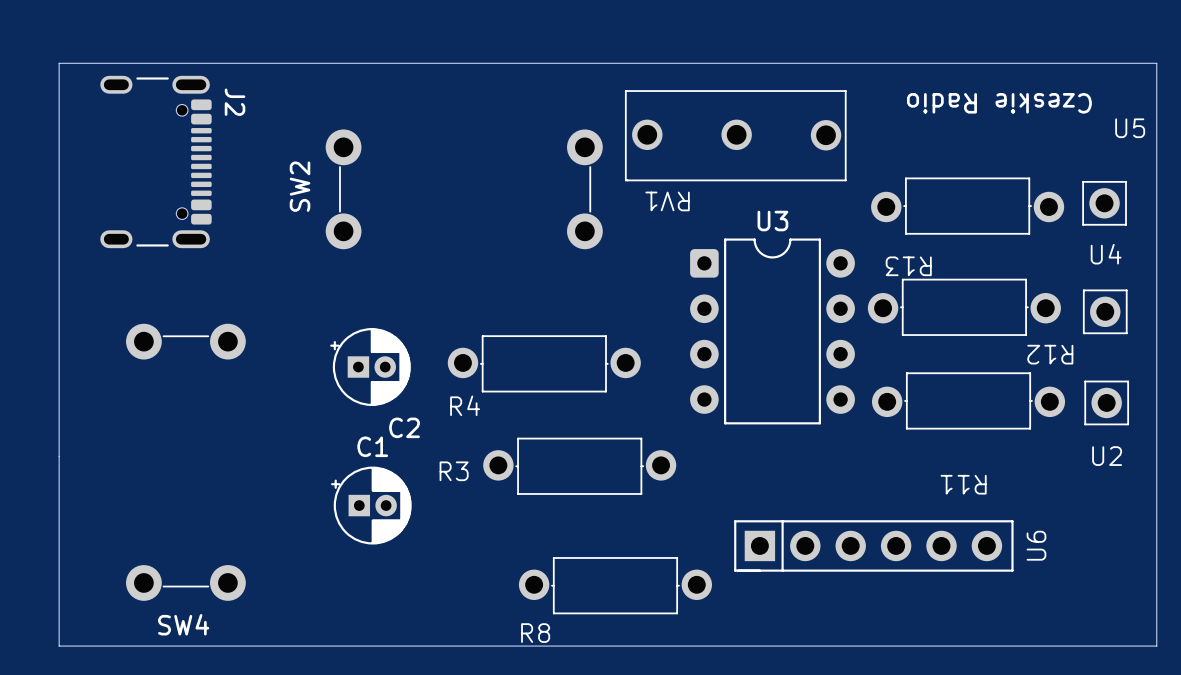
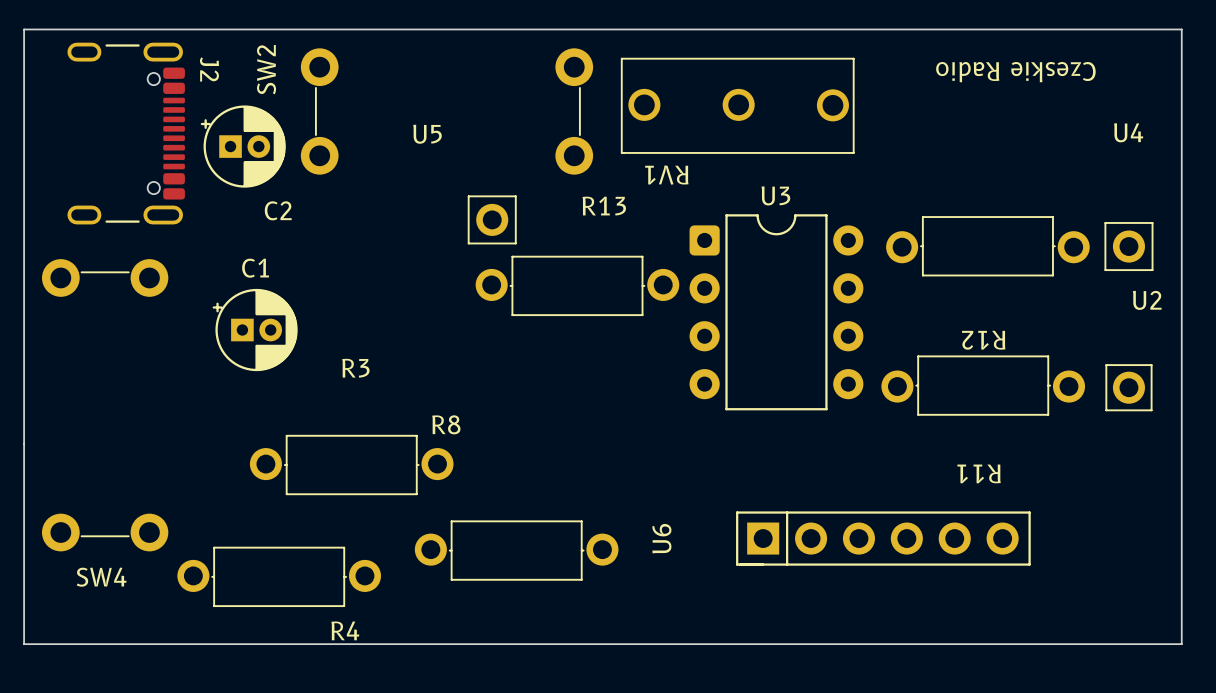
U5 name position: U5 (1130, 128) -> U5 (427, 134)
U5 footprint: [1082, 180, 1127, 226] -> [467, 195, 517, 245]
SW2 name position: SW2 (300, 186) -> SW2 (266, 69)
SW2 position: (464, 189) -> (446, 111)
R13 rotation: 0° (967, 206) -> 180° (577, 285)
R13 position: (967, 206) -> (577, 285)
U4 name position: U4 (1106, 254) -> U4 (1128, 132)
R13 name position: R13 (908, 266) -> R13 (604, 206)
U4 footprint: [1082, 289, 1128, 335] -> [1104, 222, 1154, 272]
R12 position: (964, 307) -> (987, 246)
R12 name position: R12 (1050, 354) -> R12 (983, 340)
R4 position: (544, 363) -> (279, 576)
C2 position: (370, 367) -> (243, 146)
R4 name position: R4 (465, 405) -> R4 (345, 630)
U2 name position: U2 (1107, 456) -> U2 (1147, 300)
SW4 position: (185, 462) -> (105, 405)
R3 position: (579, 466) -> (351, 465)
R3 name position: R3 (454, 471) -> R3 (355, 368)
C1 position: (371, 505) -> (255, 330)
U6 name position: U6 (1036, 545) -> U6 (661, 538)
R8 position: (615, 585) -> (516, 550)
R8 name position: R8 (535, 633) -> R8 (446, 424)

